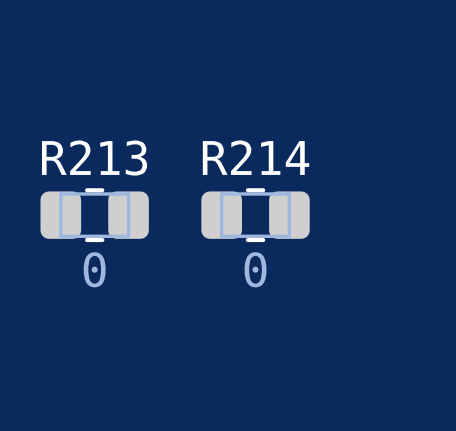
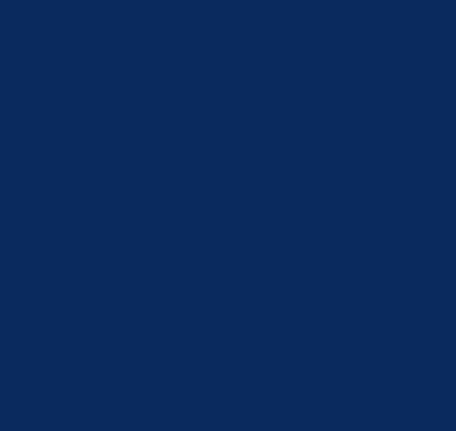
R213: 0 (94, 215) -> none
R214: 0 (255, 215) -> none

